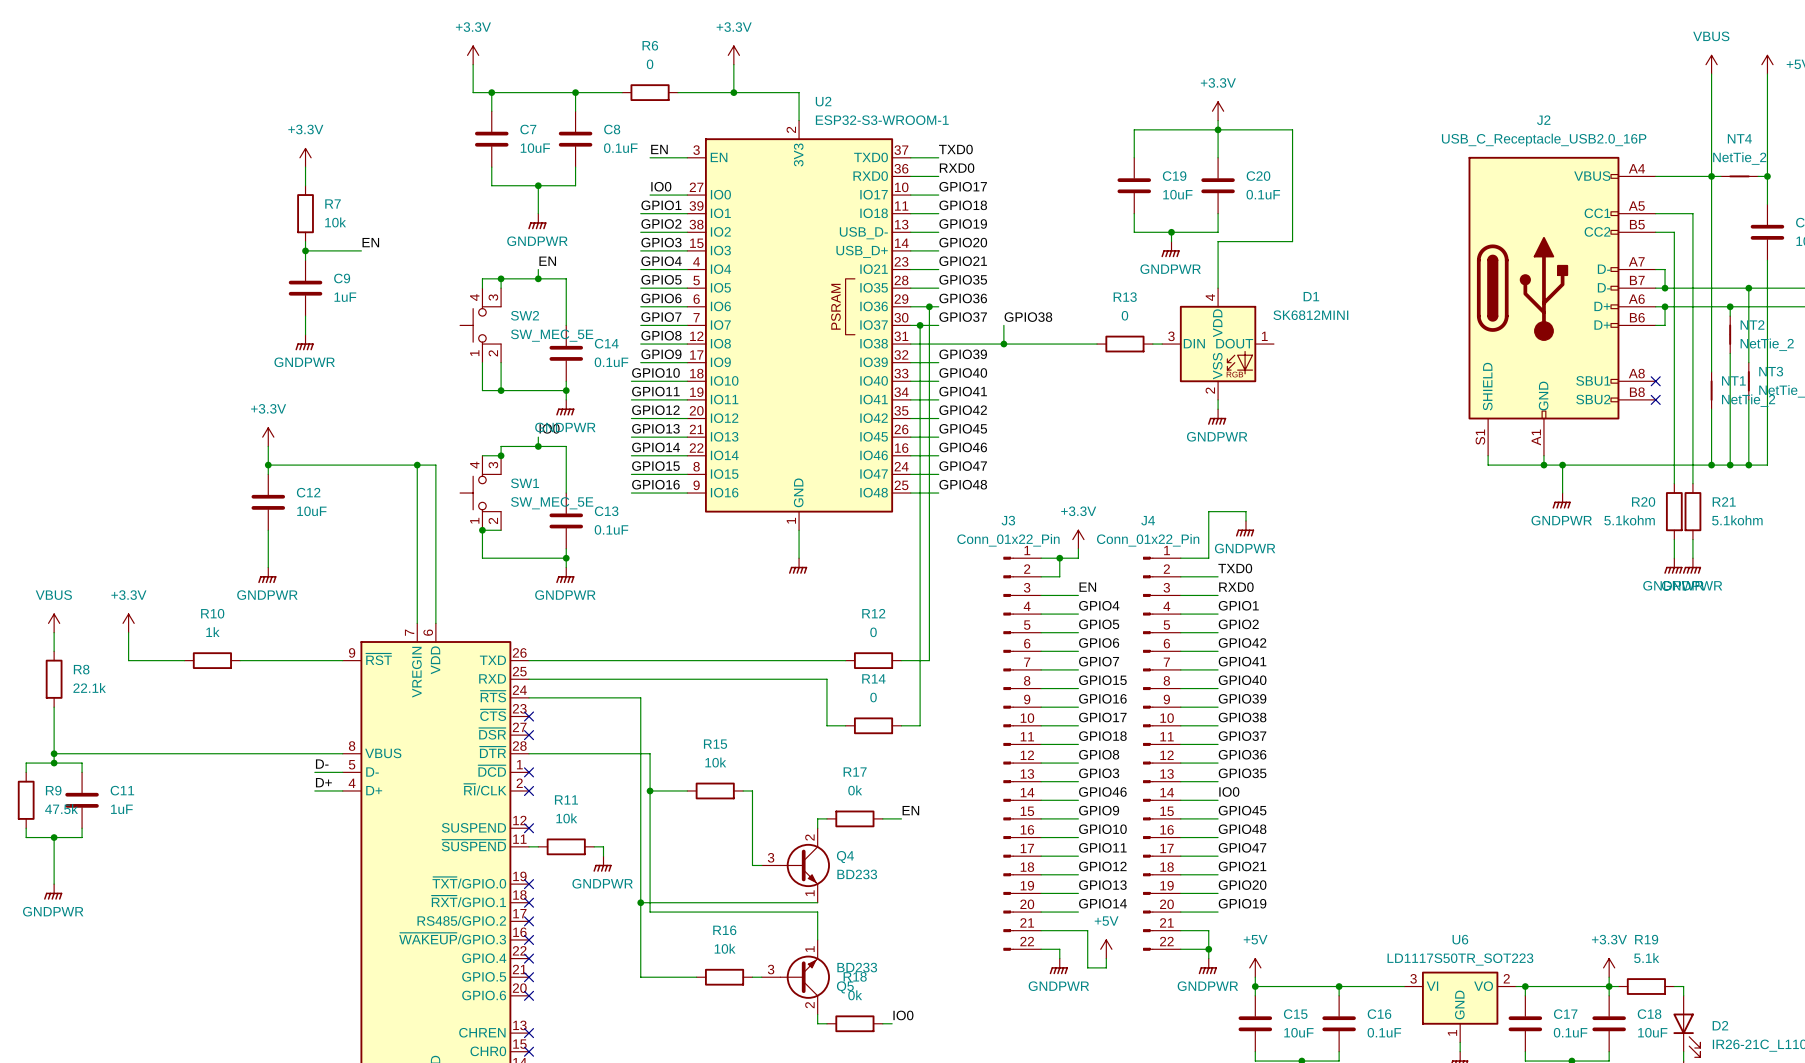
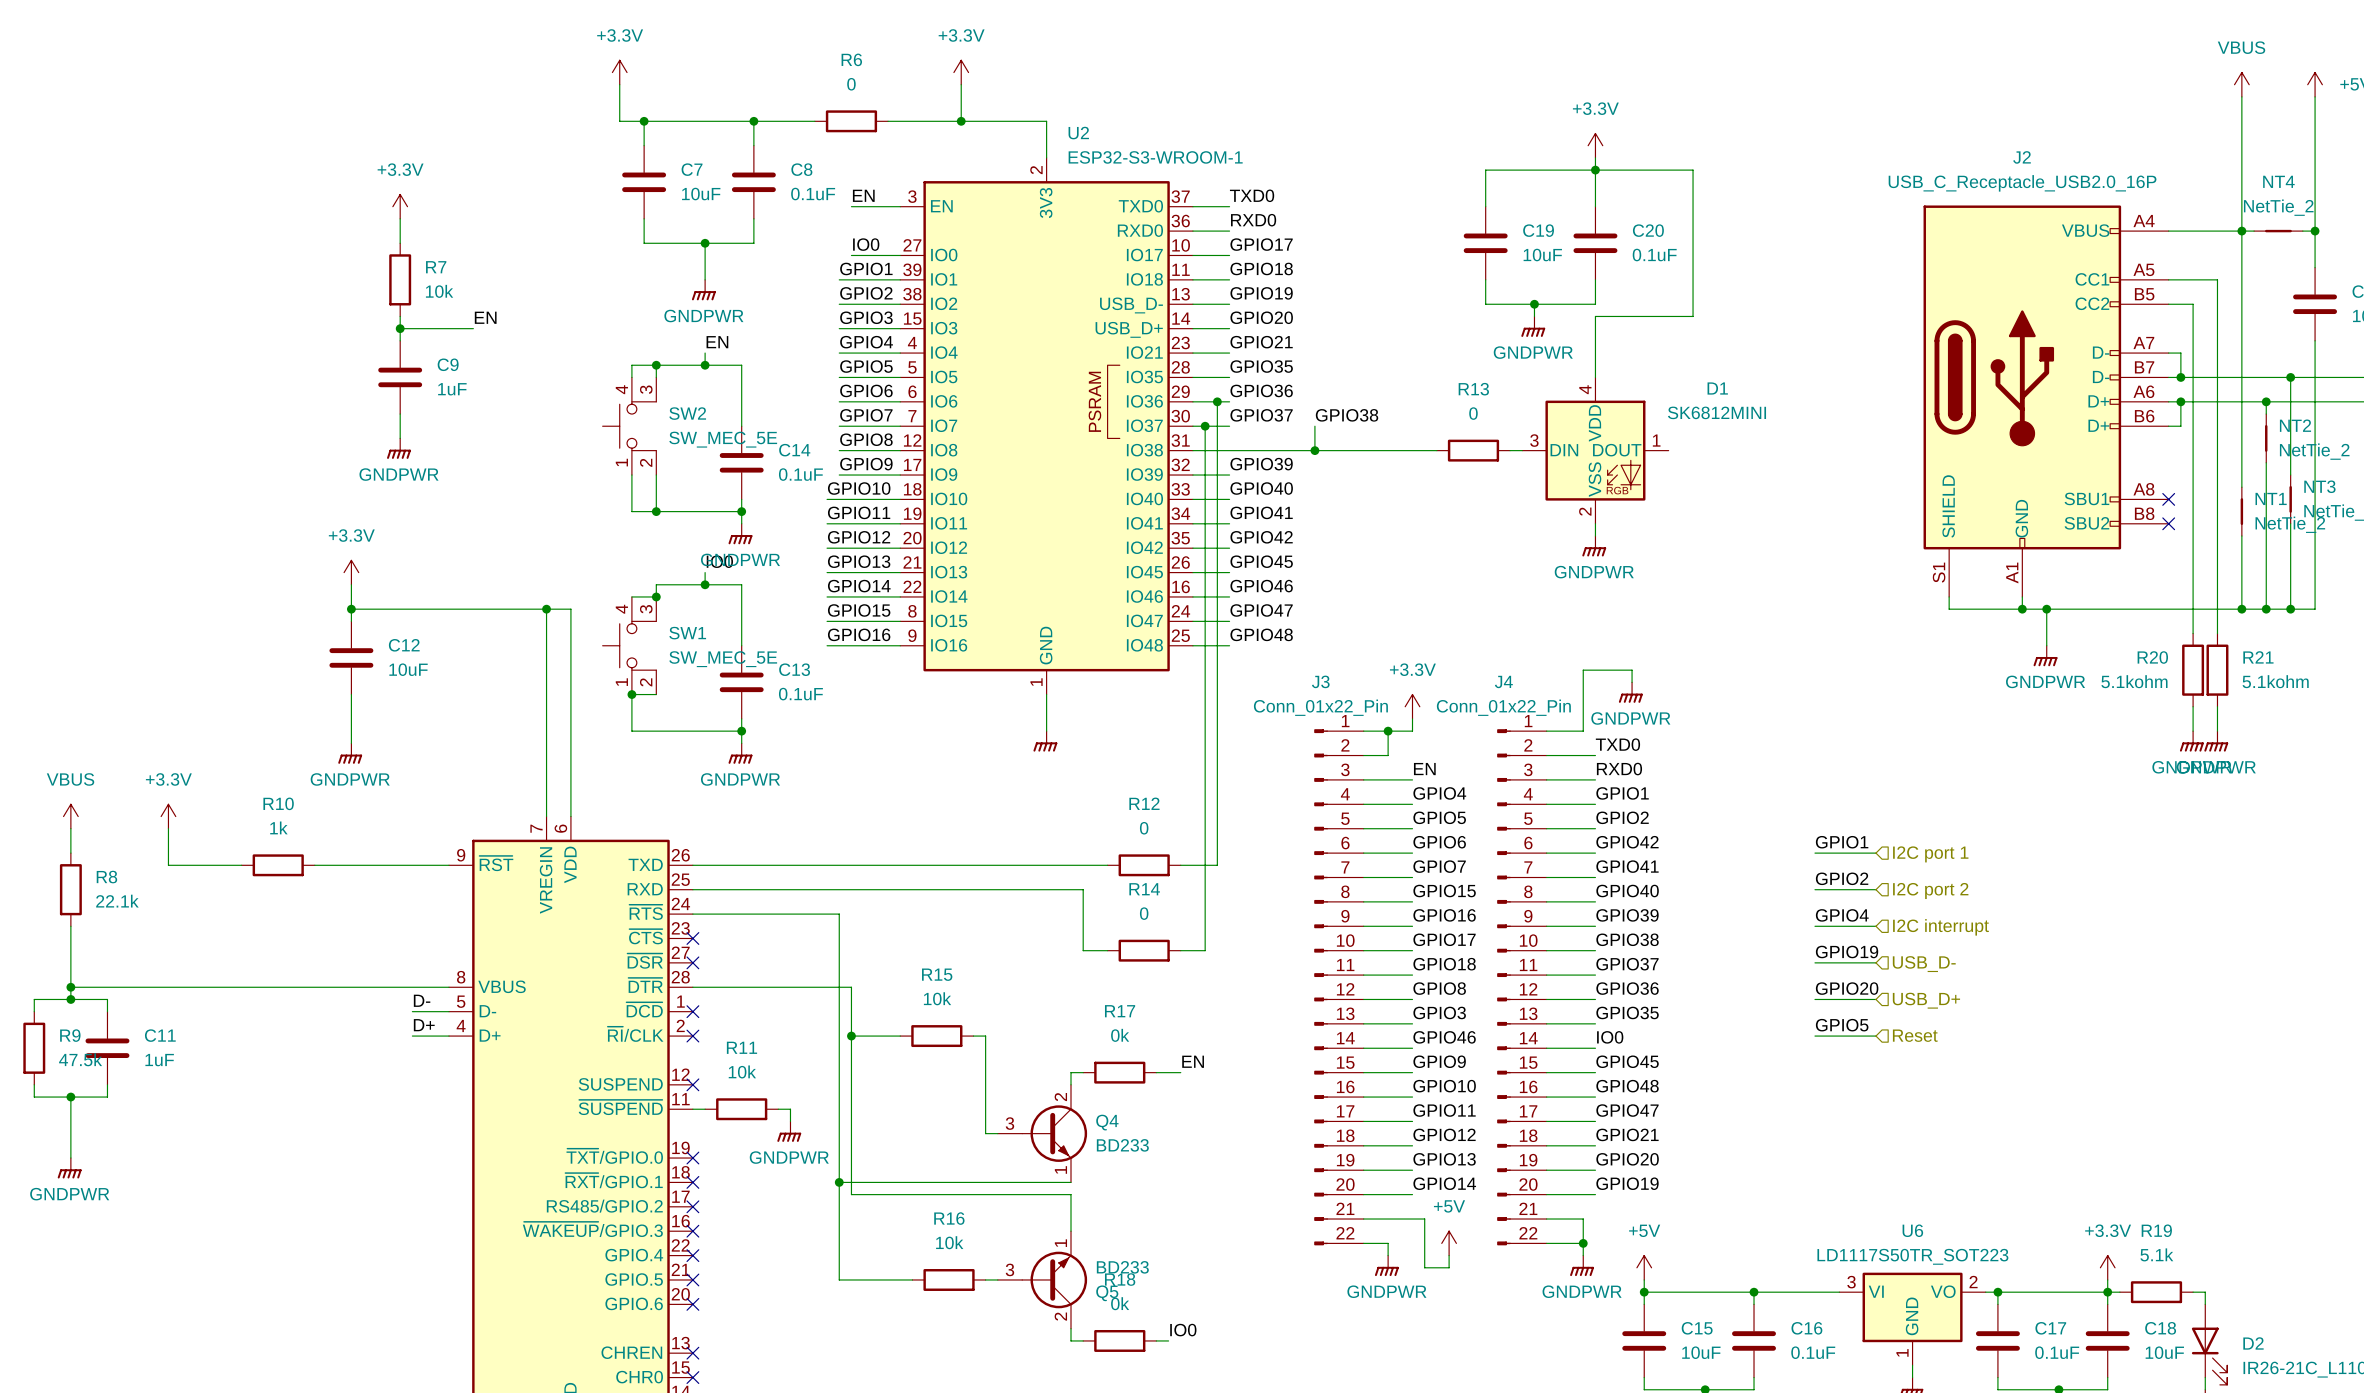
label: none -> GPIO1 (1842, 842)
wire: none -> (1814, 853) (1875, 853)
hierarchical label: none -> I2C port 1 (1930, 854)
label: none -> GPIO2 (1842, 878)
wire: none -> (1814, 889) (1875, 889)
hierarchical label: none -> I2C port 2 (1930, 890)
label: none -> GPIO4 (1842, 915)
wire: none -> (1814, 926) (1875, 926)
hierarchical label: none -> I2C interrupt (1940, 927)
label: none -> GPIO19 (1847, 951)
wire: none -> (1814, 962) (1875, 962)
hierarchical label: none -> USB_D- (1924, 964)
label: none -> GPIO20 (1847, 988)
wire: none -> (1814, 999) (1875, 999)
hierarchical label: none -> USB_D+ (1926, 1000)
label: none -> GPIO5 (1842, 1025)
wire: none -> (1814, 1036) (1875, 1036)
hierarchical label: none -> Reset (1915, 1035)

